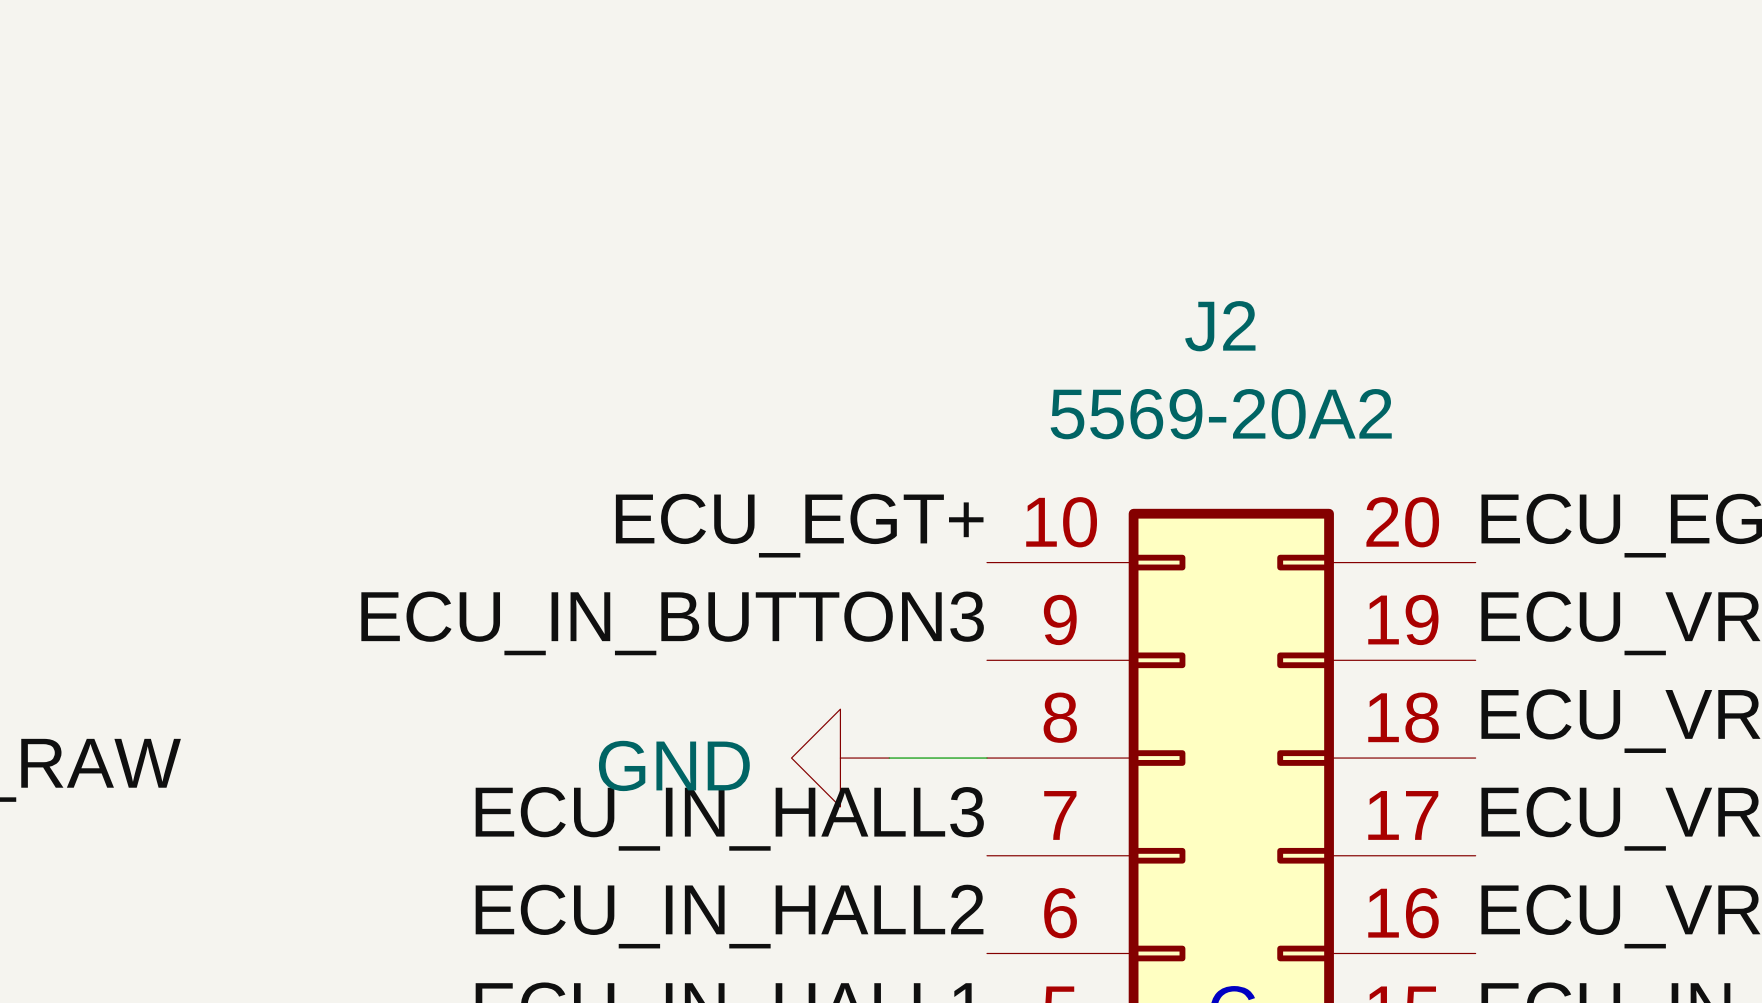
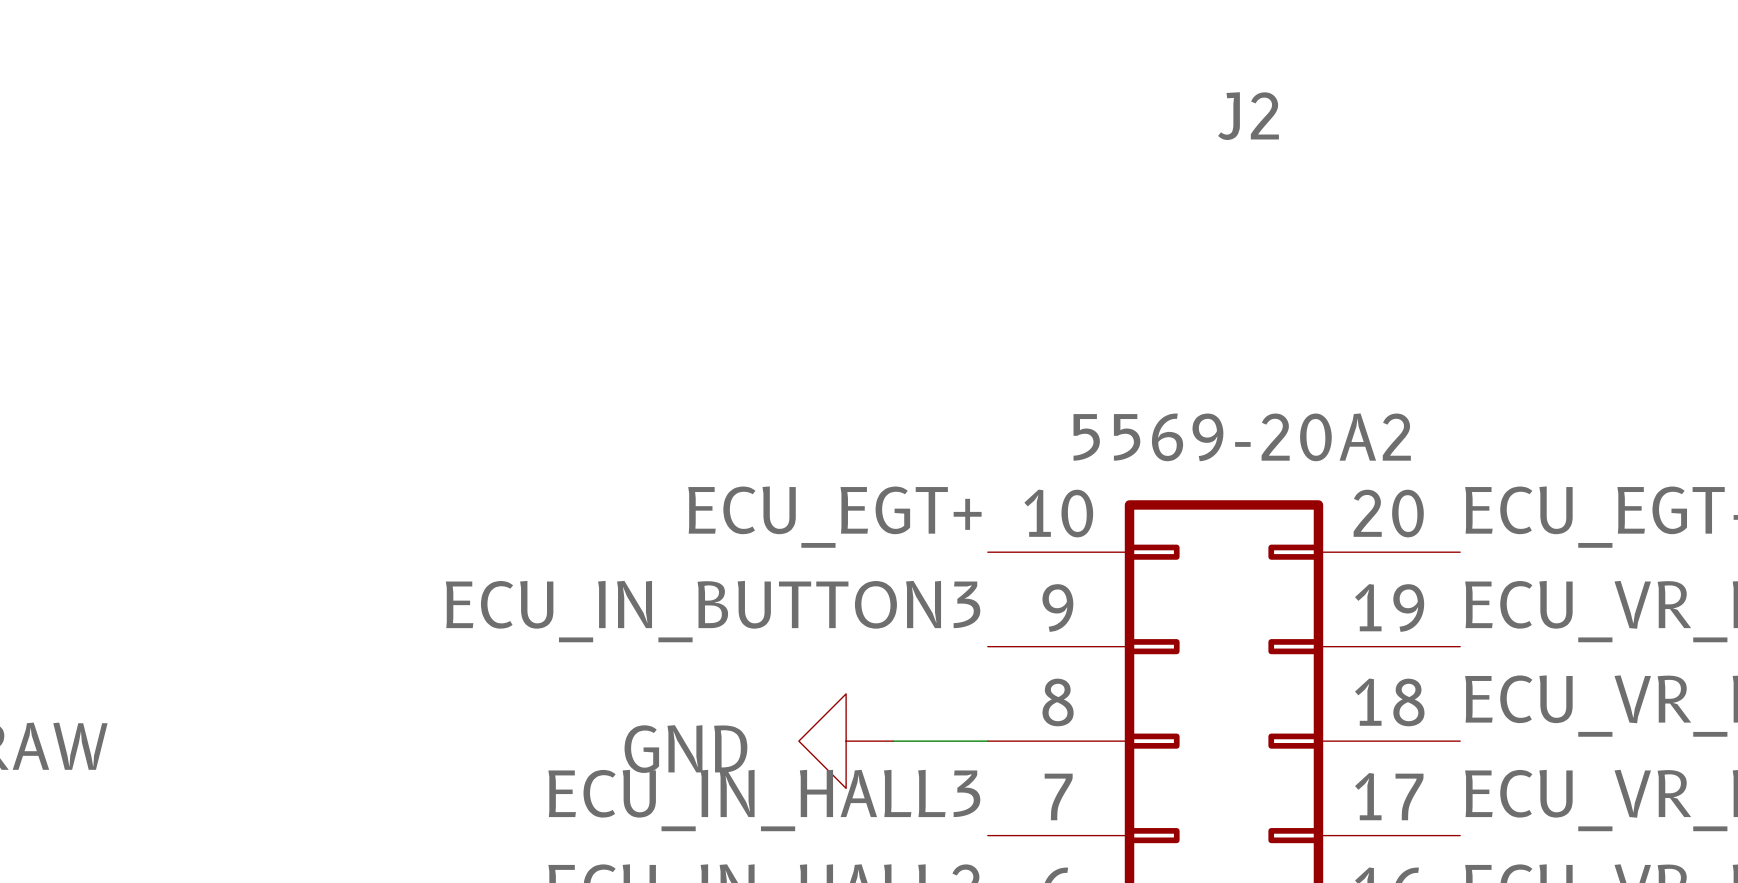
J2 name position: J2 (1220, 326) -> J2 (1248, 116)
J2 value position: 5569-20A2 (1221, 414) -> 5569-20A2 (1242, 437)

